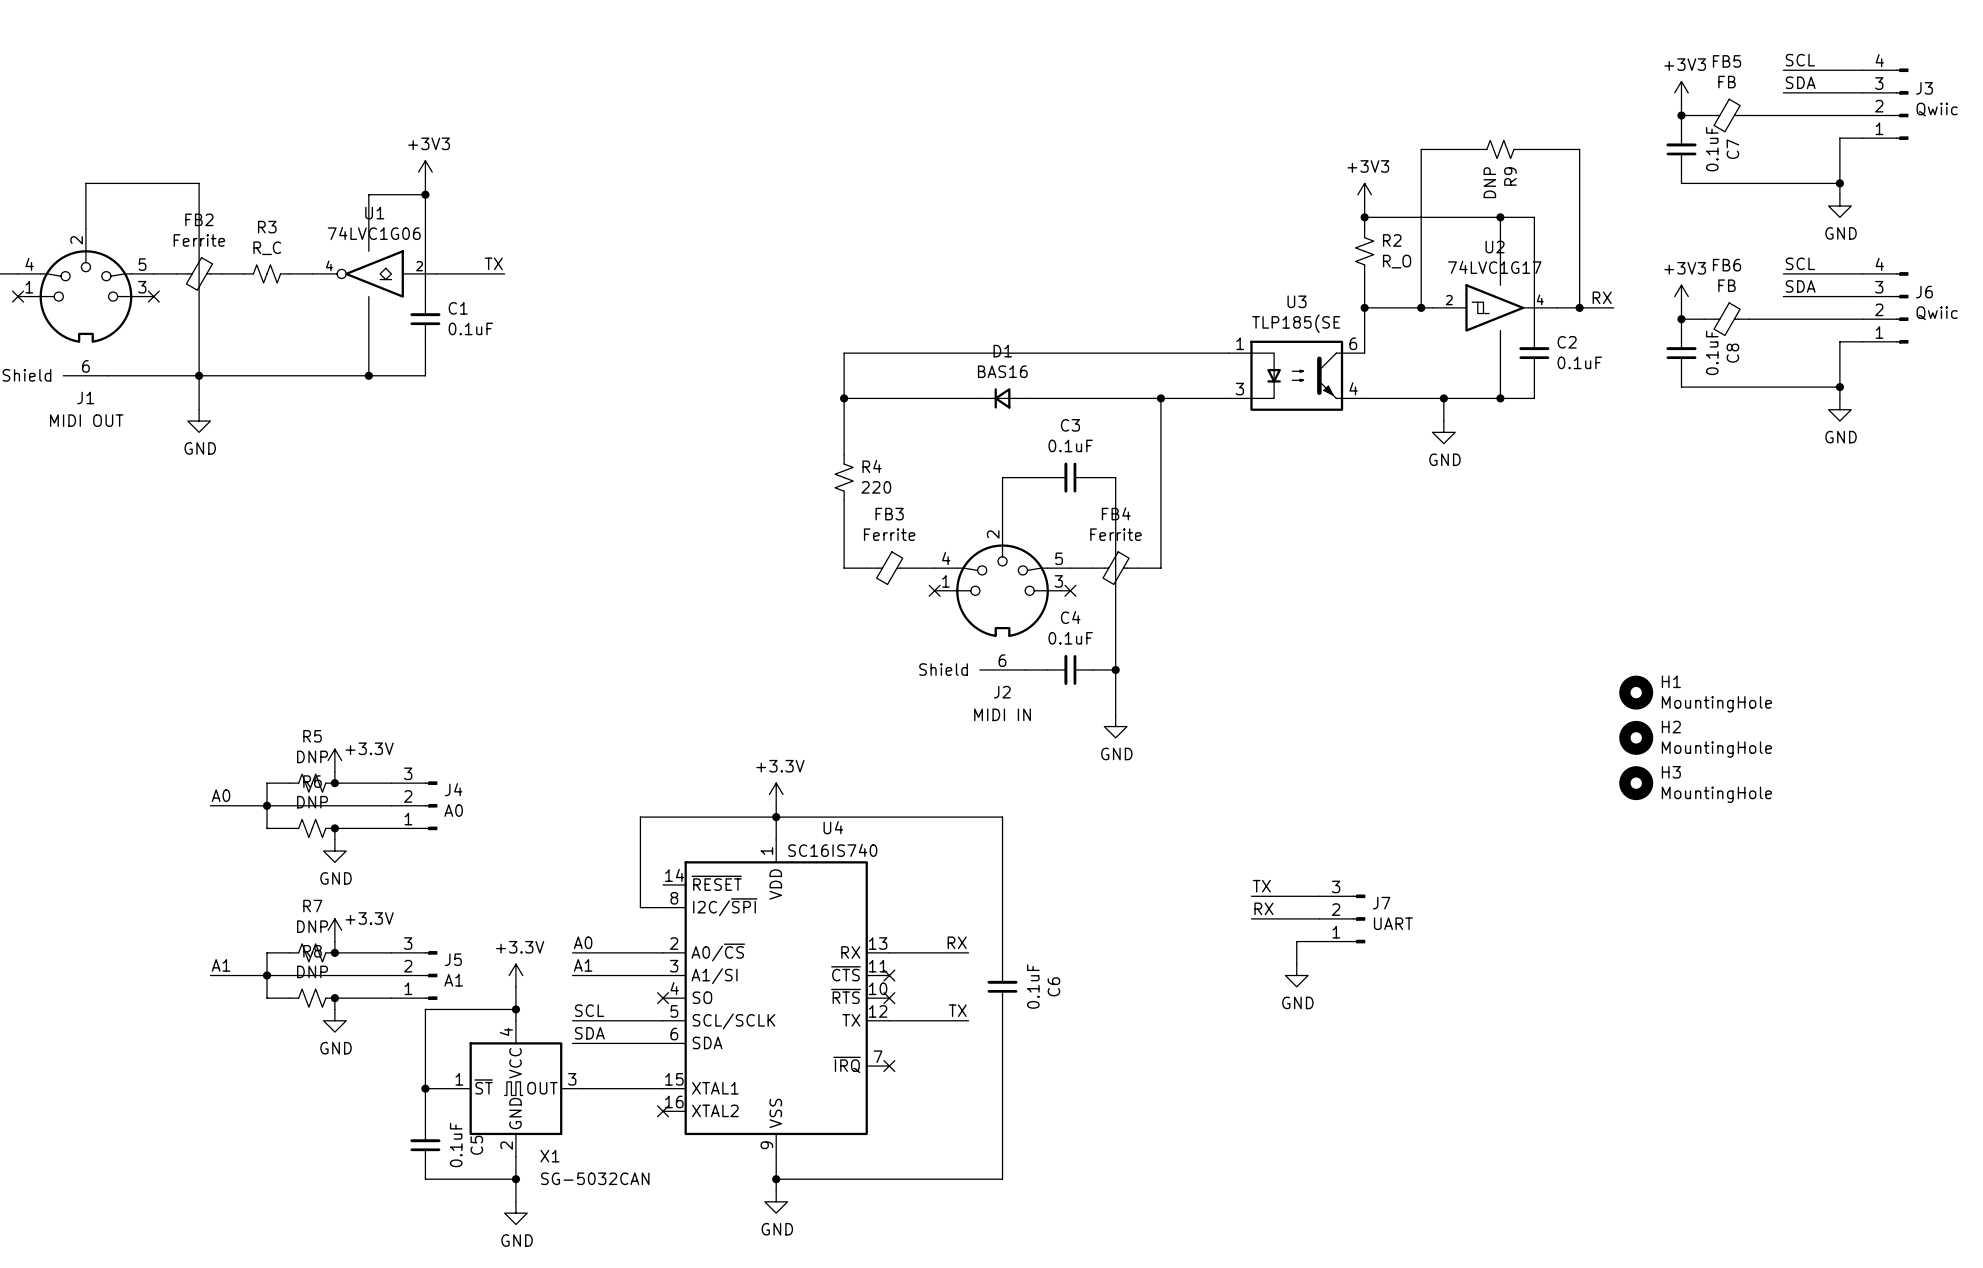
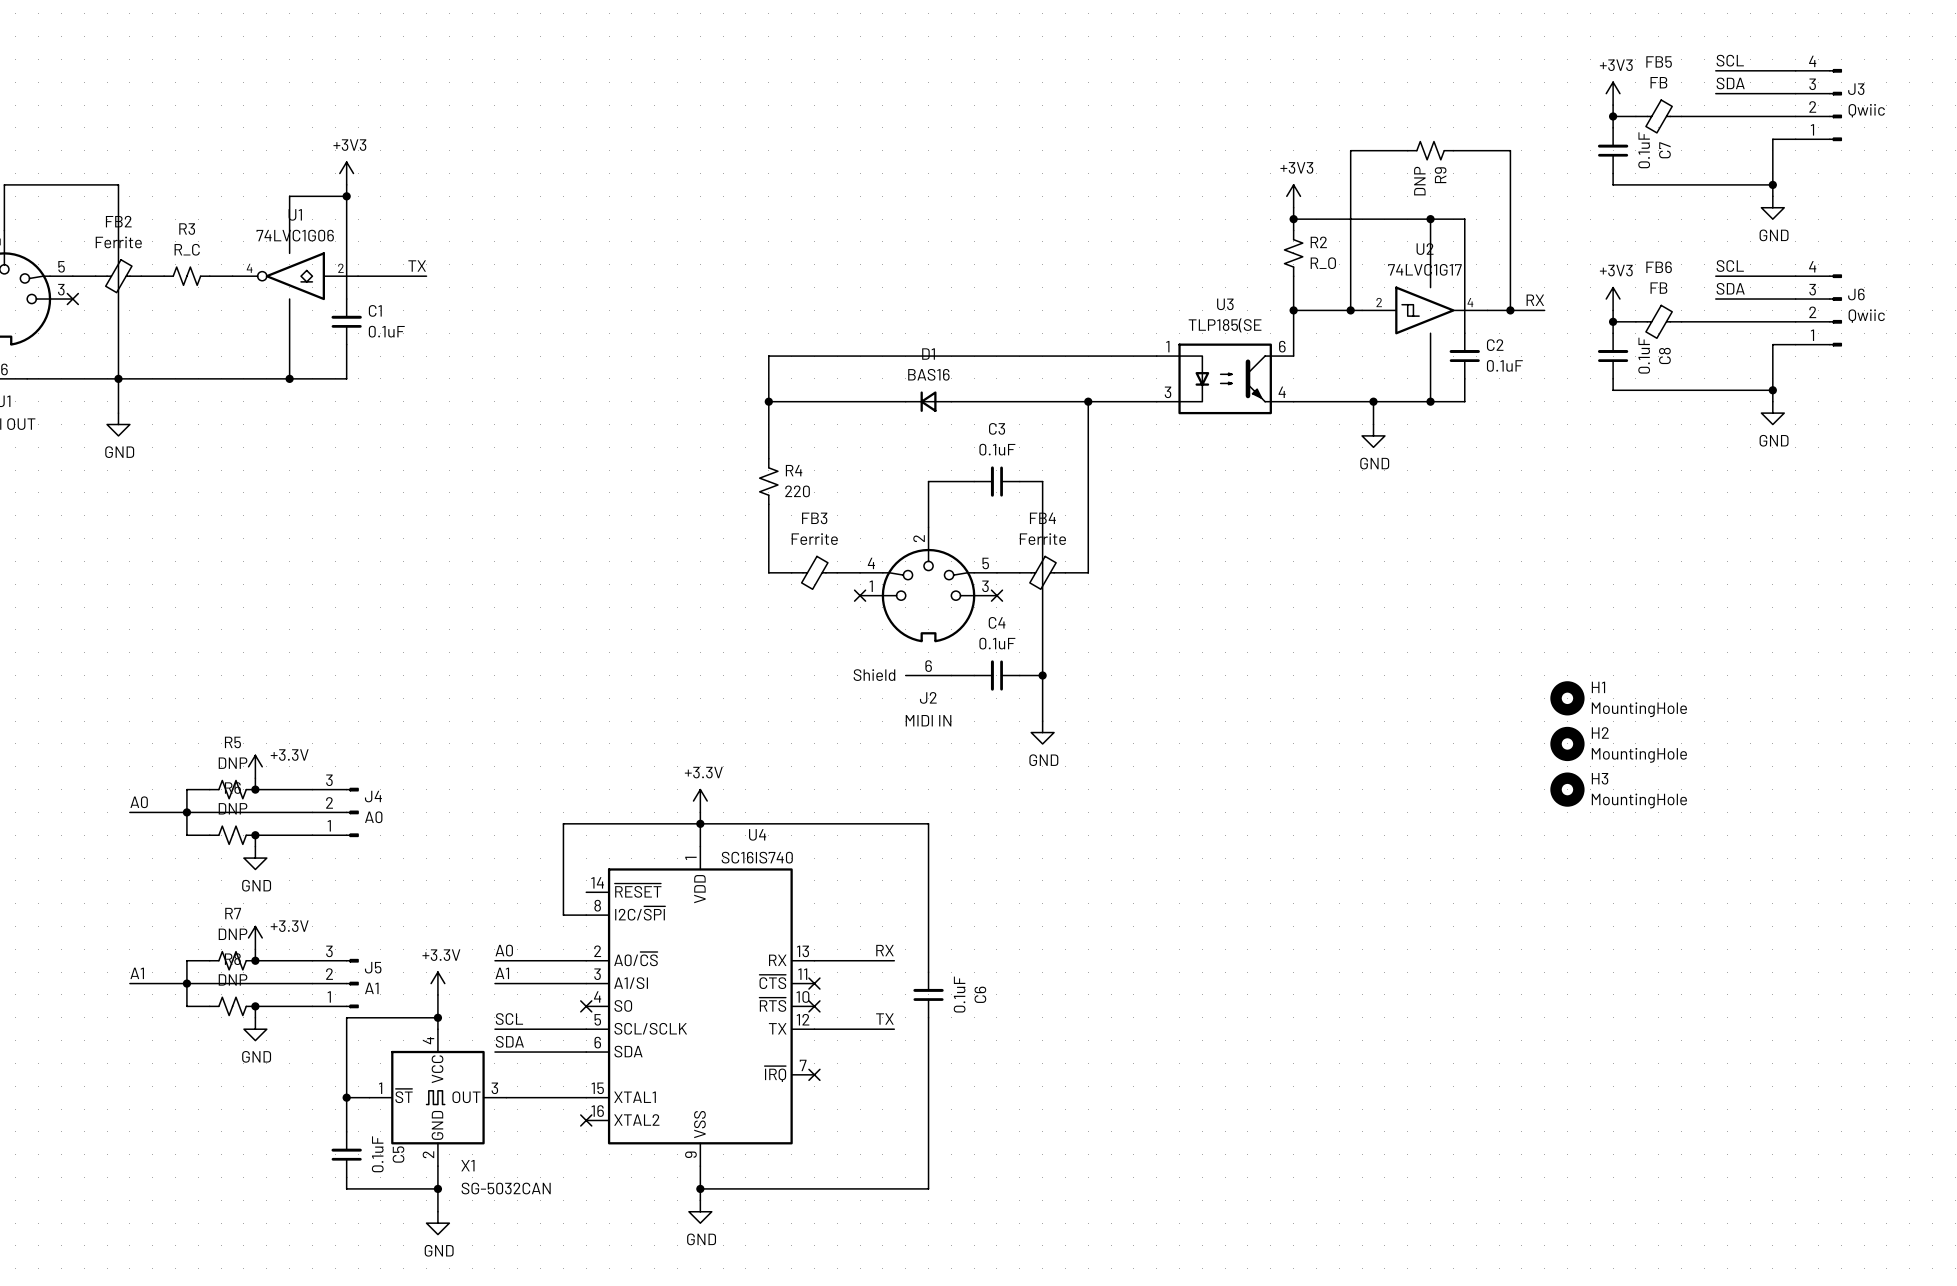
label: TX (1261, 886) -> none
wire: (1251, 896) (1319, 896) -> none
label: RX (1263, 908) -> none
wire: (1251, 918) (1319, 918) -> none
J7: UART (1342, 918) -> none
wire: (1319, 941) (1296, 941) (1296, 964) -> none
power symbol: GND (1296, 975) -> none

